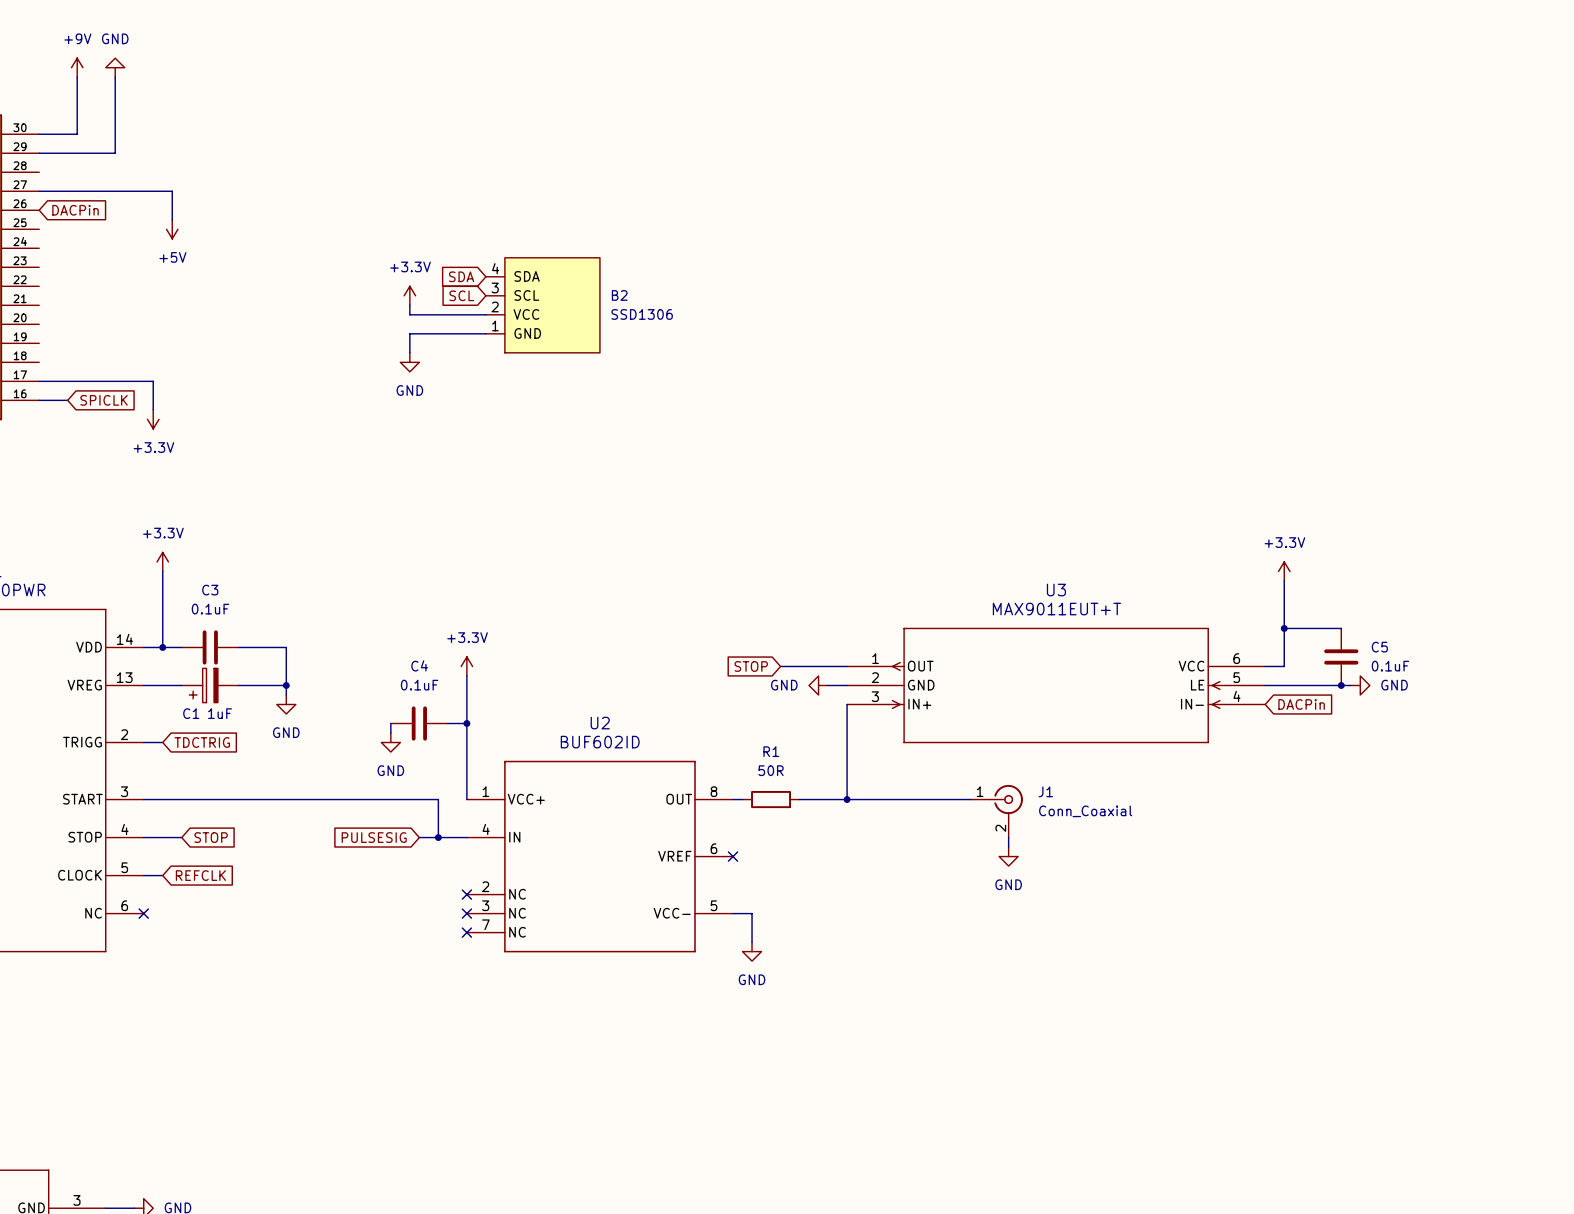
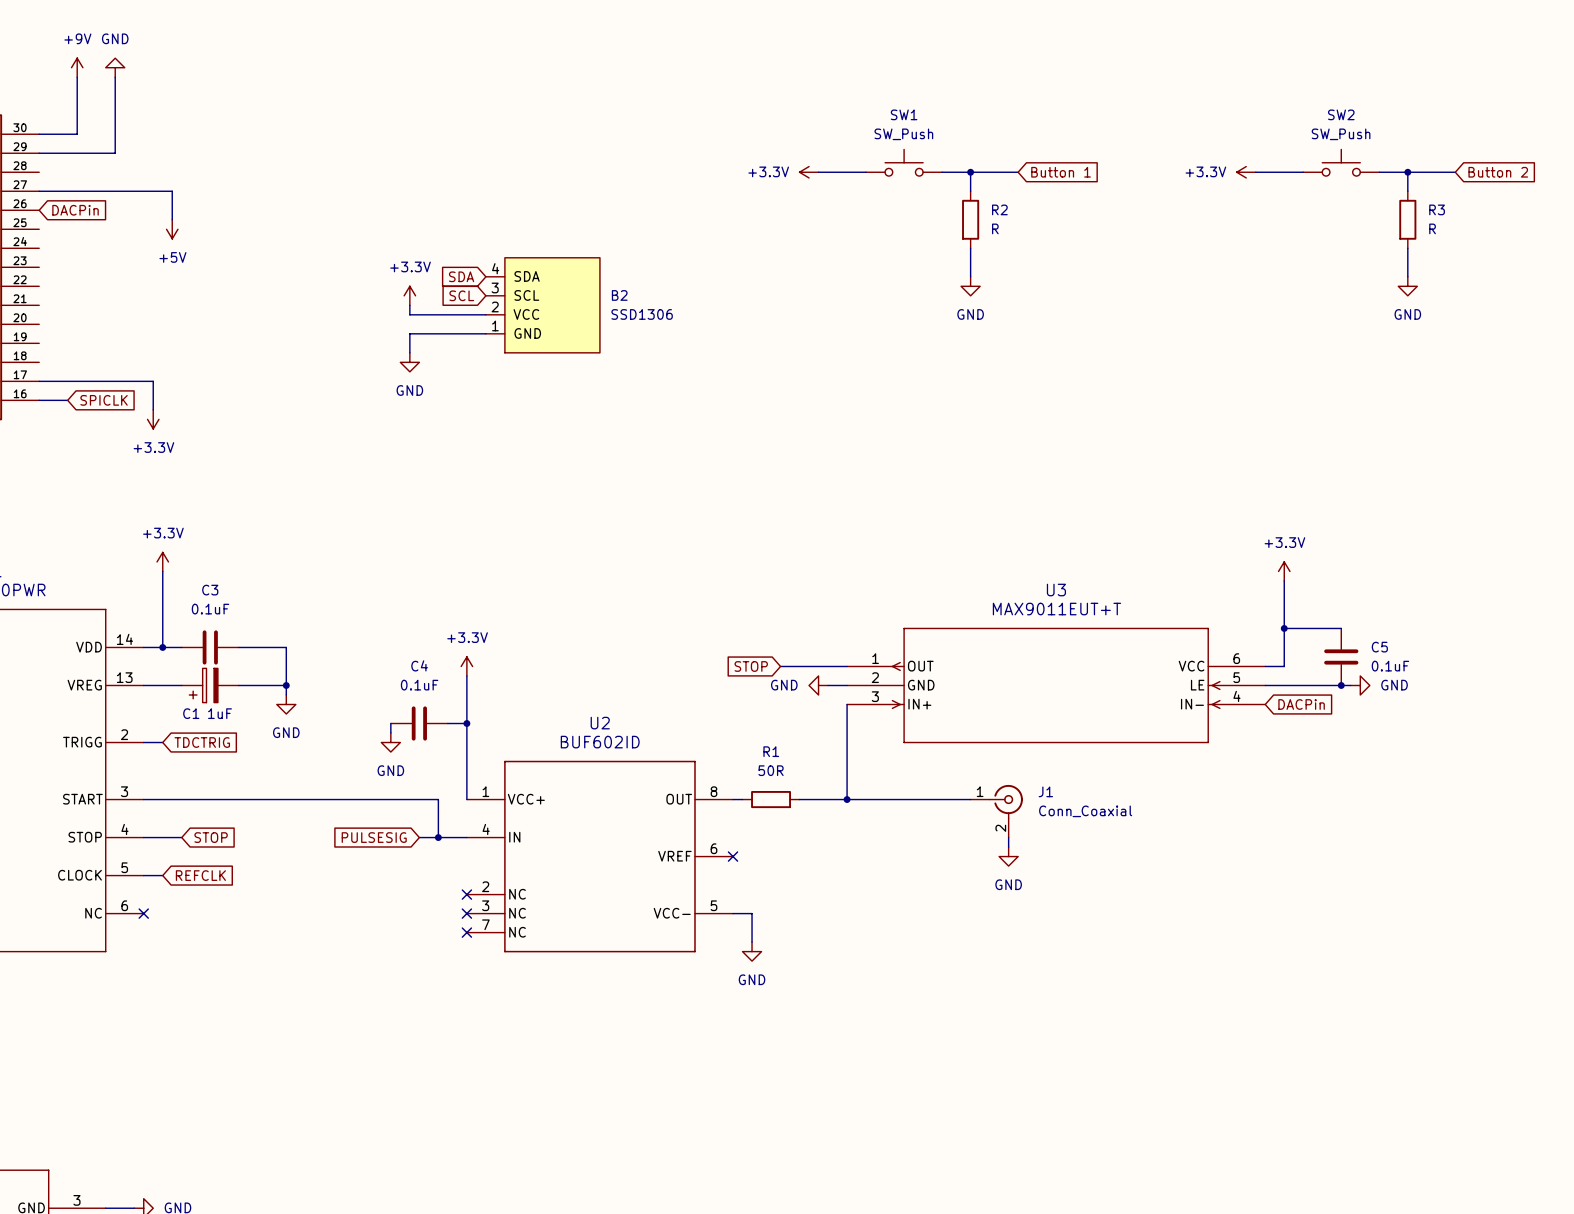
SW1: none -> SW_Push (904, 162)
SW2: none -> SW_Push (1341, 162)
power symbol: none -> +3.3V (809, 172)
wire: none -> (818, 172) (866, 172)
wire: none -> (942, 172) (1018, 172)
wire: none -> (970, 172) (970, 191)
junction: none -> (970, 172)
global label: none -> Button 1 (1061, 172)
power symbol: none -> +3.3V (1246, 172)
wire: none -> (1255, 172) (1303, 172)
wire: none -> (1379, 172) (1455, 172)
wire: none -> (1407, 172) (1407, 191)
junction: none -> (1407, 172)
global label: none -> Button 2 (1498, 172)
R2: none -> R (970, 219)
R3: none -> R (1407, 219)
wire: none -> (970, 248) (970, 276)
wire: none -> (1407, 248) (1407, 276)
power symbol: none -> GND (970, 286)
power symbol: none -> GND (1407, 286)

